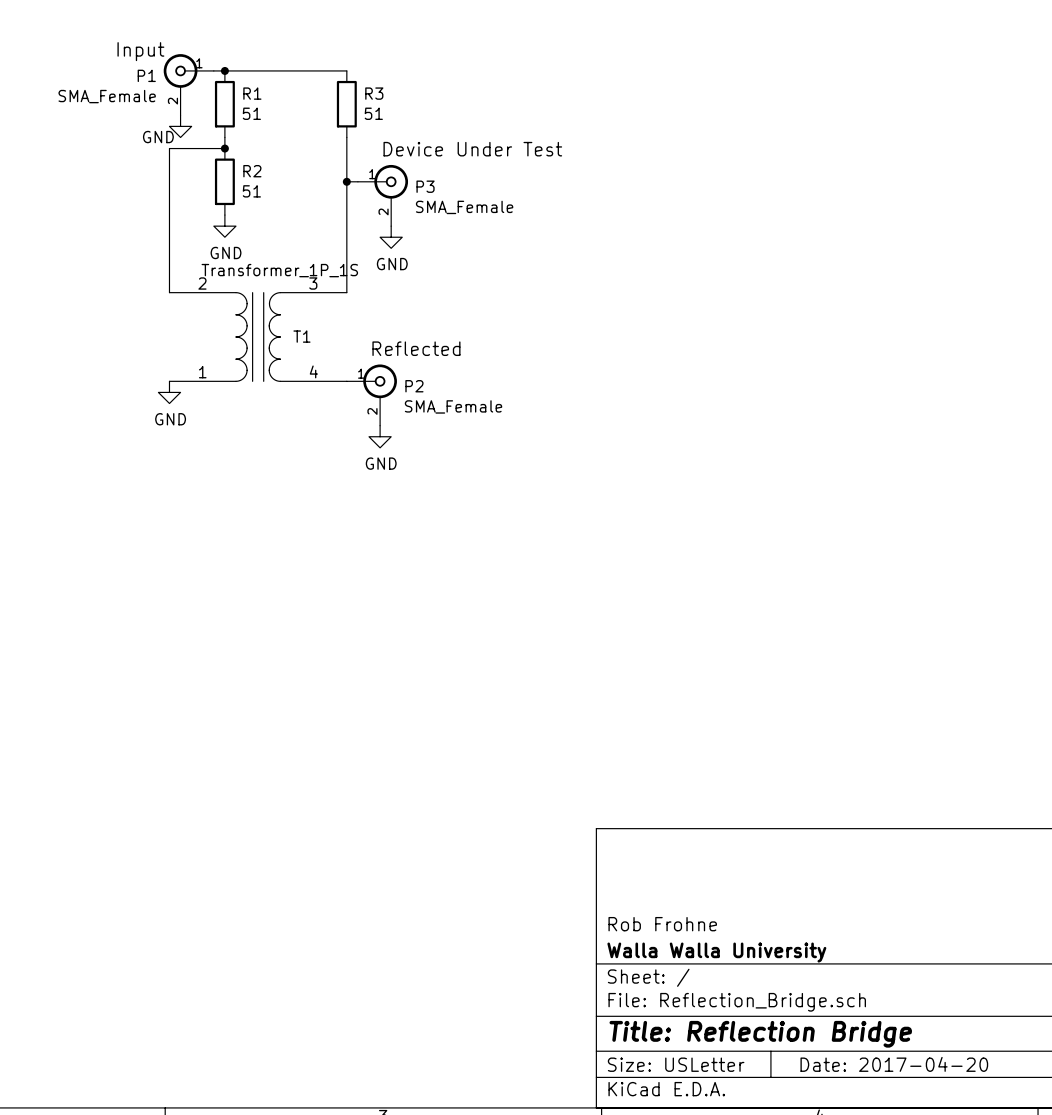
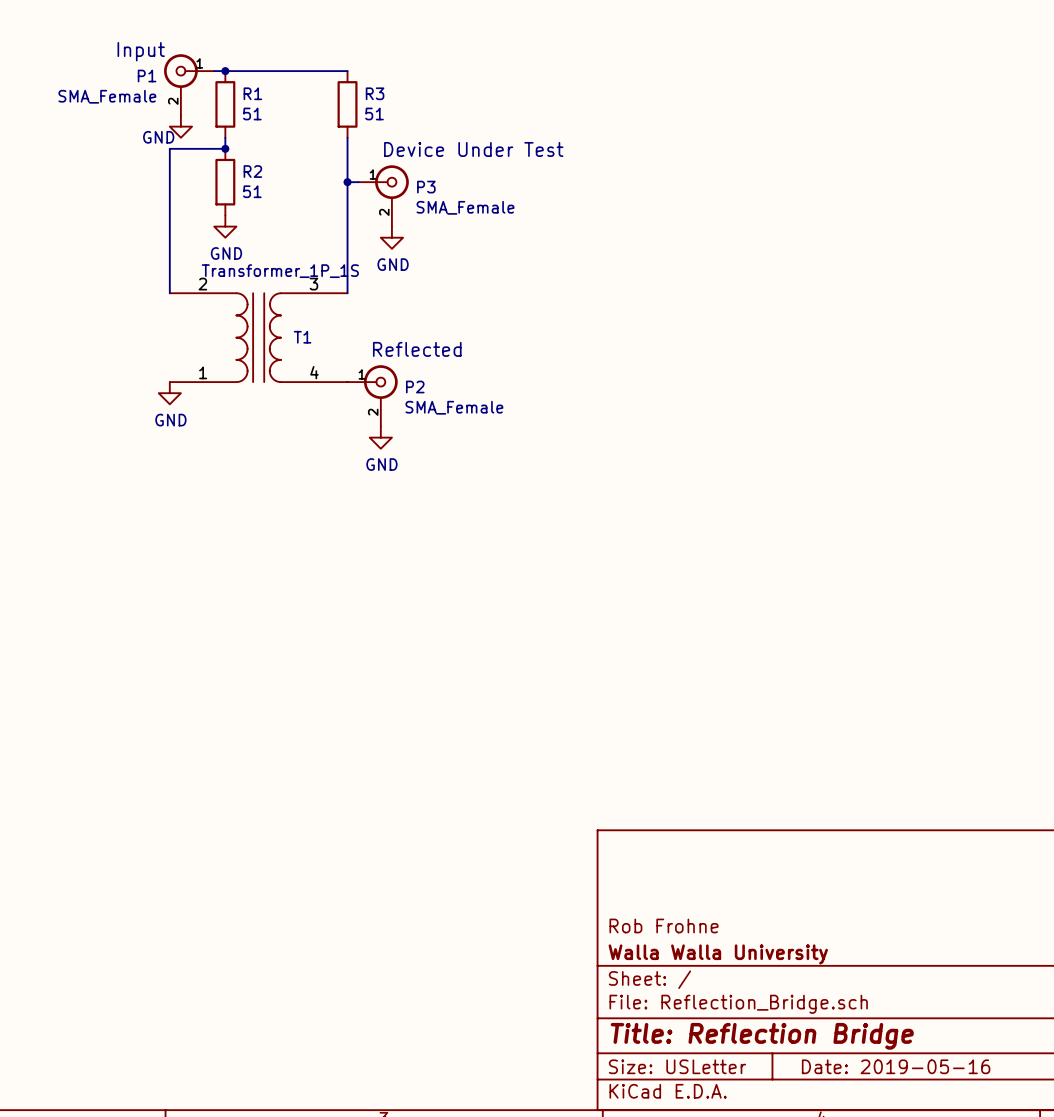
title block: Date: 2017-04-20 (894, 1064) -> Date: 2019-05-16 (896, 1066)

